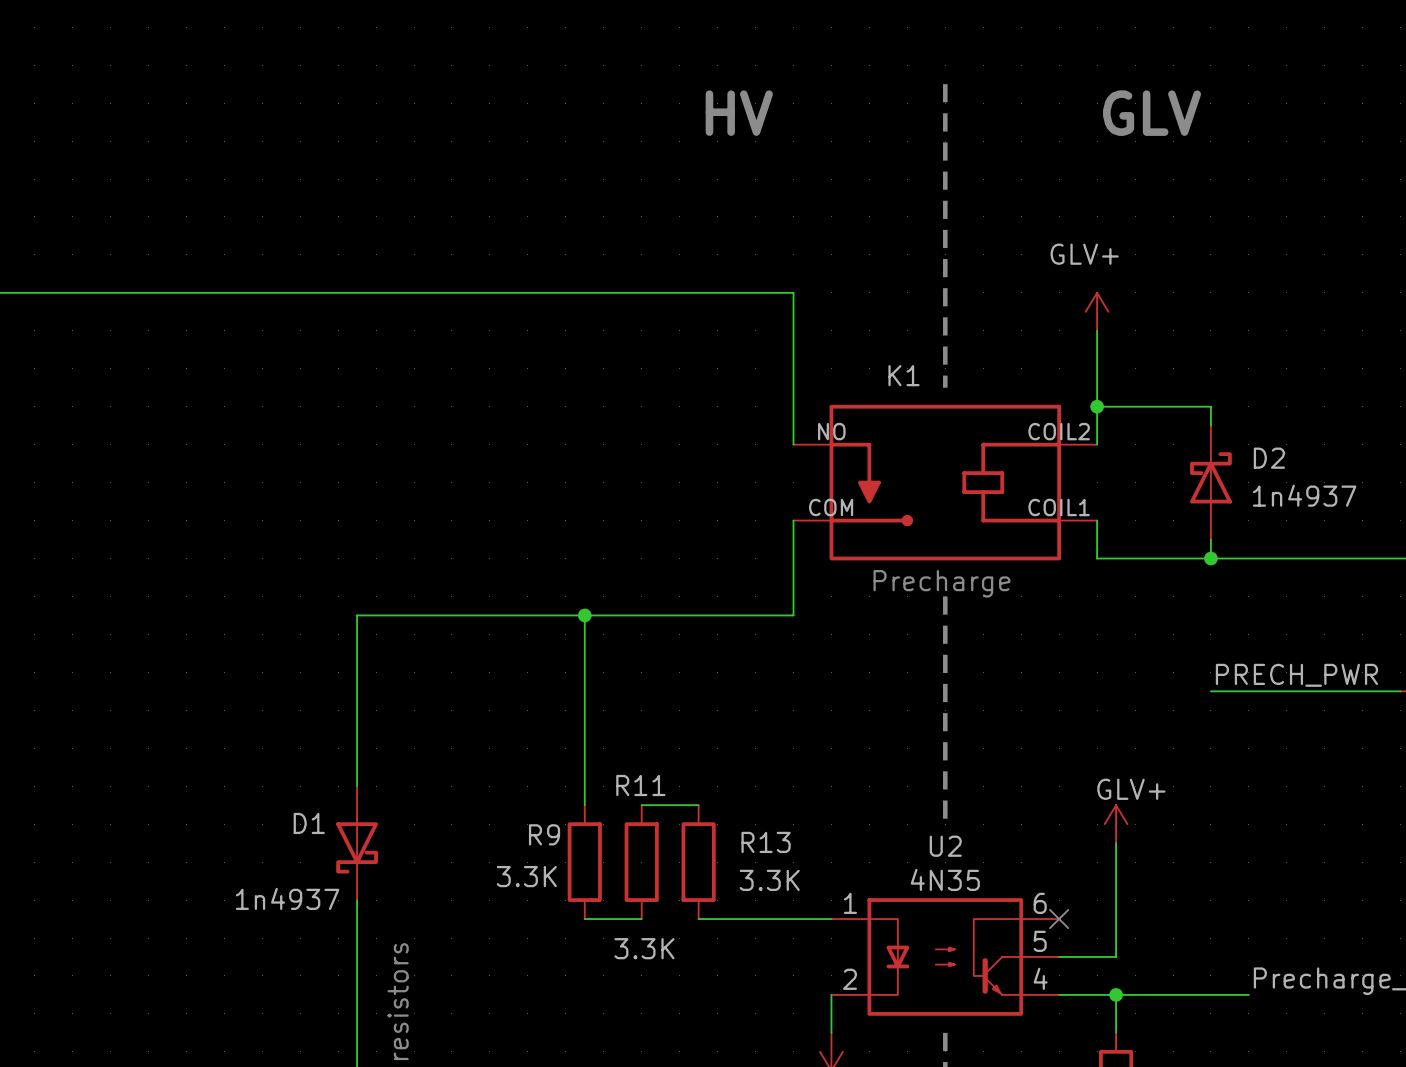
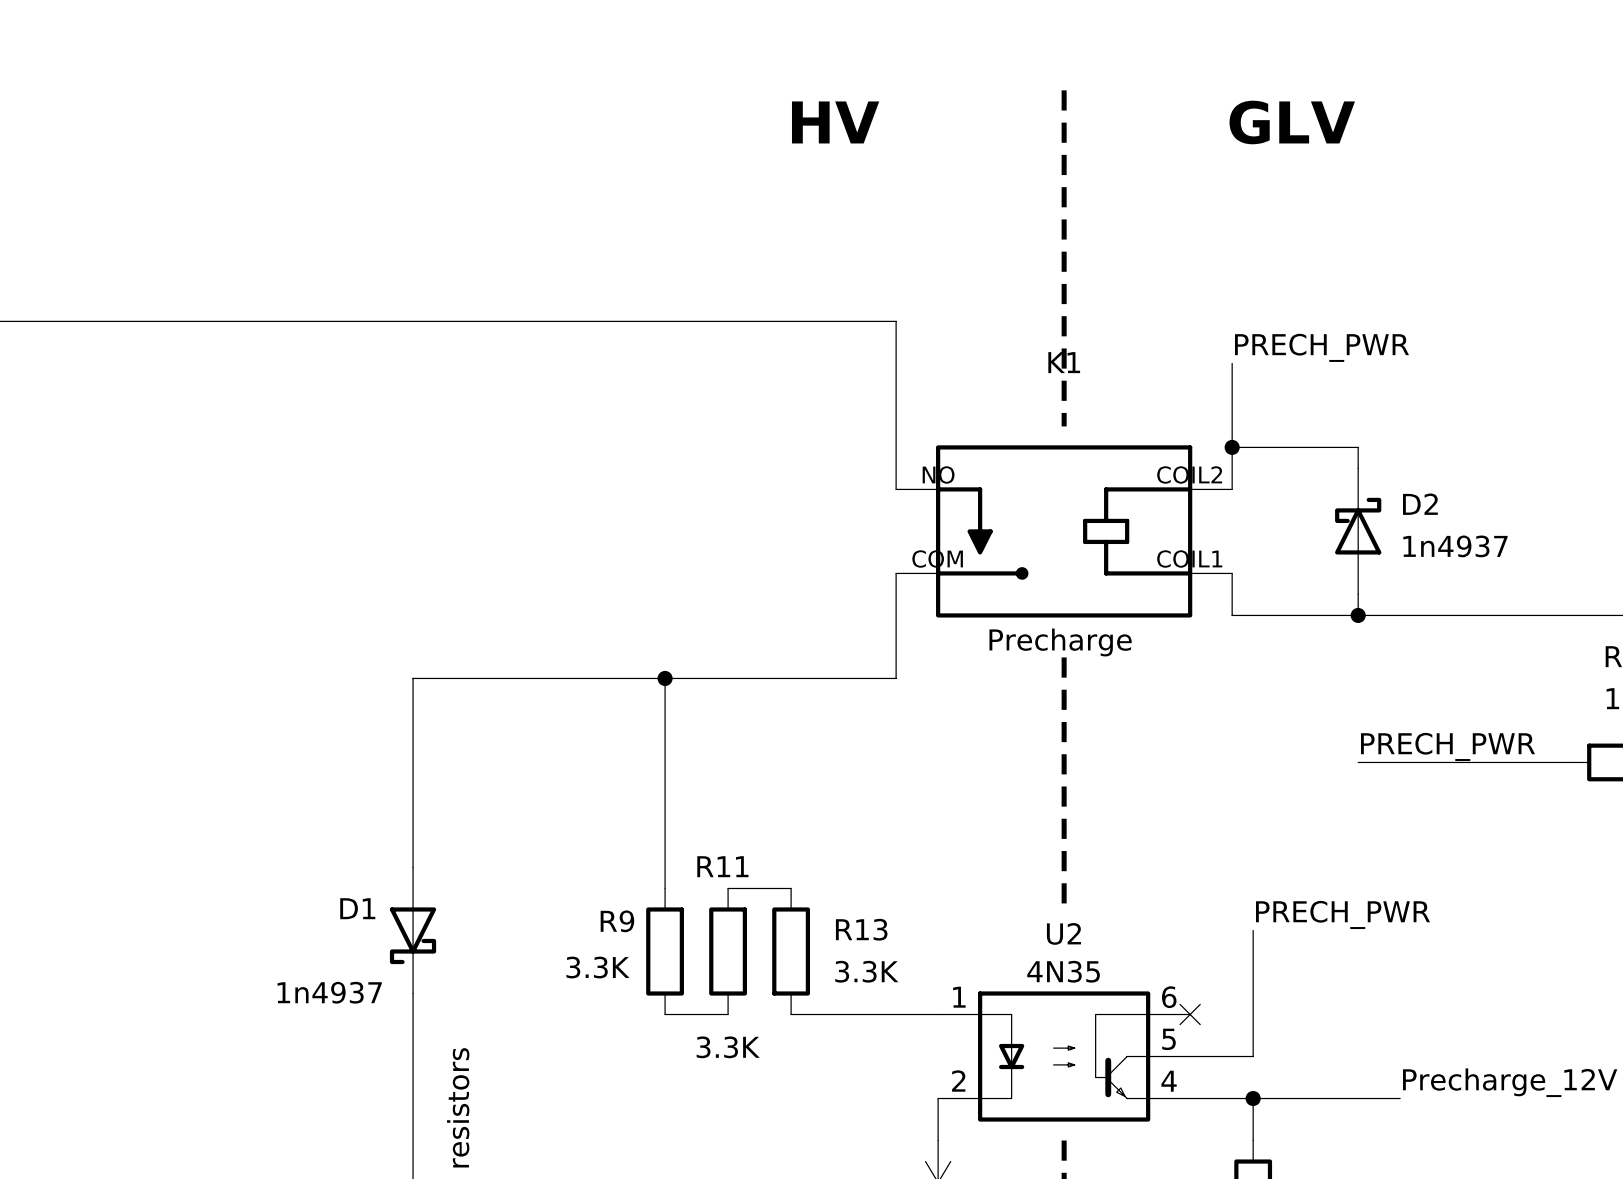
power symbol: GLV+ (1097, 311) -> none
label: none -> PRECH_PWR (1321, 347)
K1 name position: K1 (904, 375) -> K1 (1064, 362)
power symbol: GLV+ (1116, 824) -> none
label: none -> PRECH_PWR (1342, 914)

